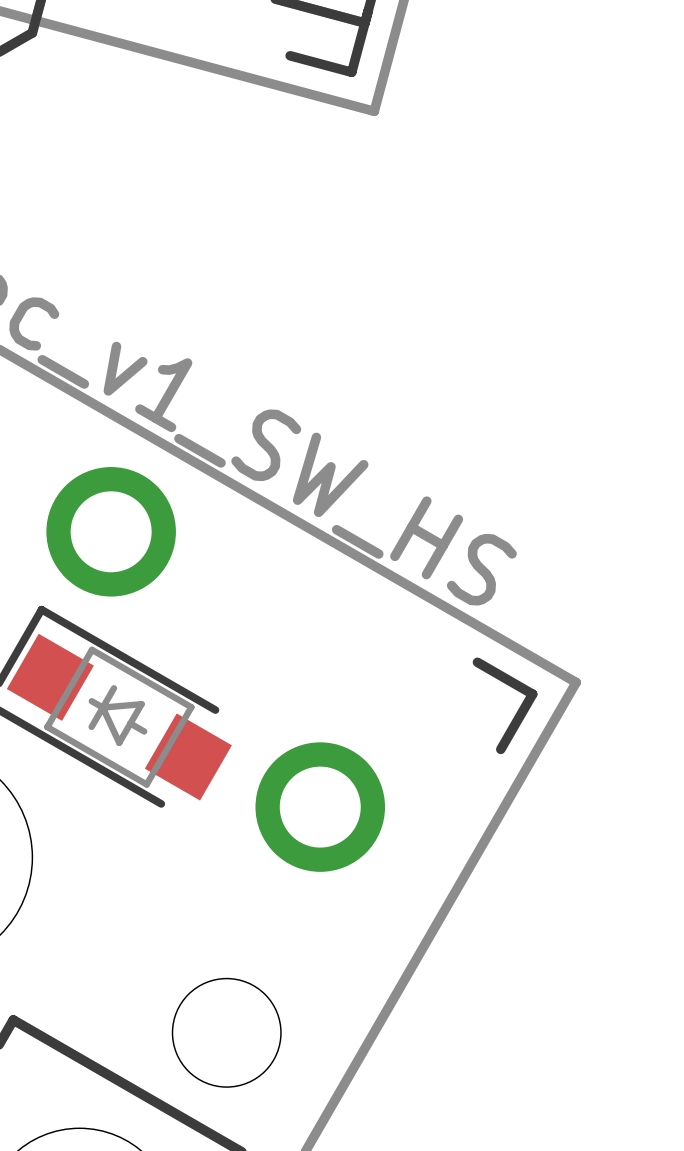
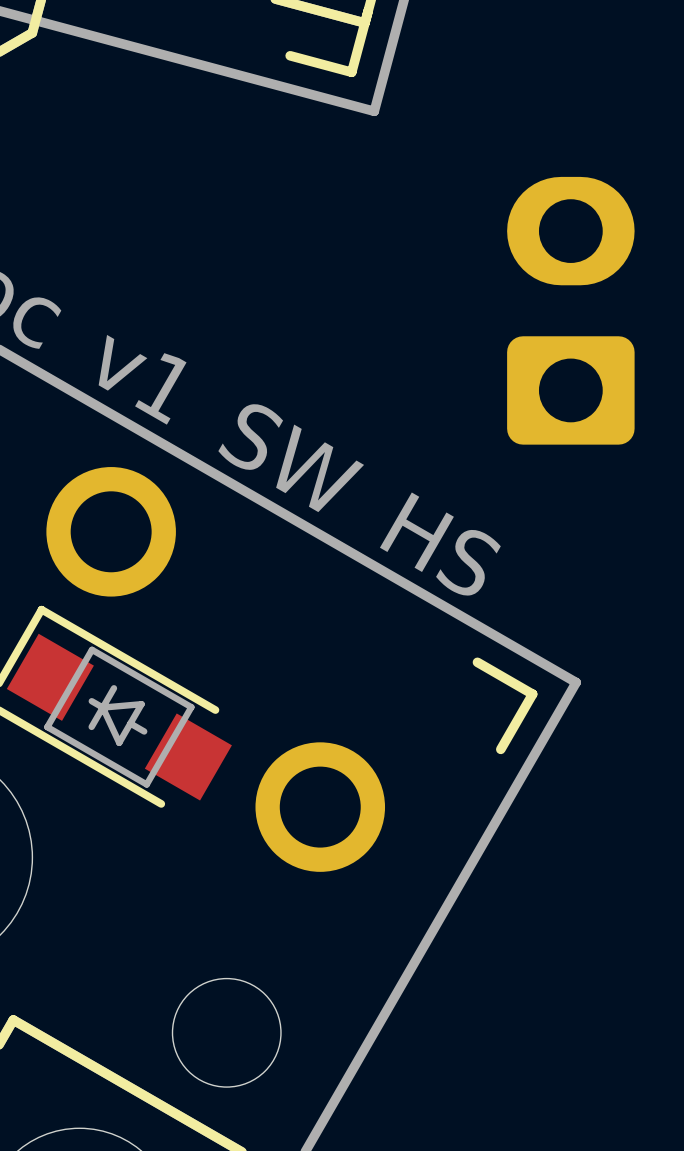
part: none -> (570, 310)

